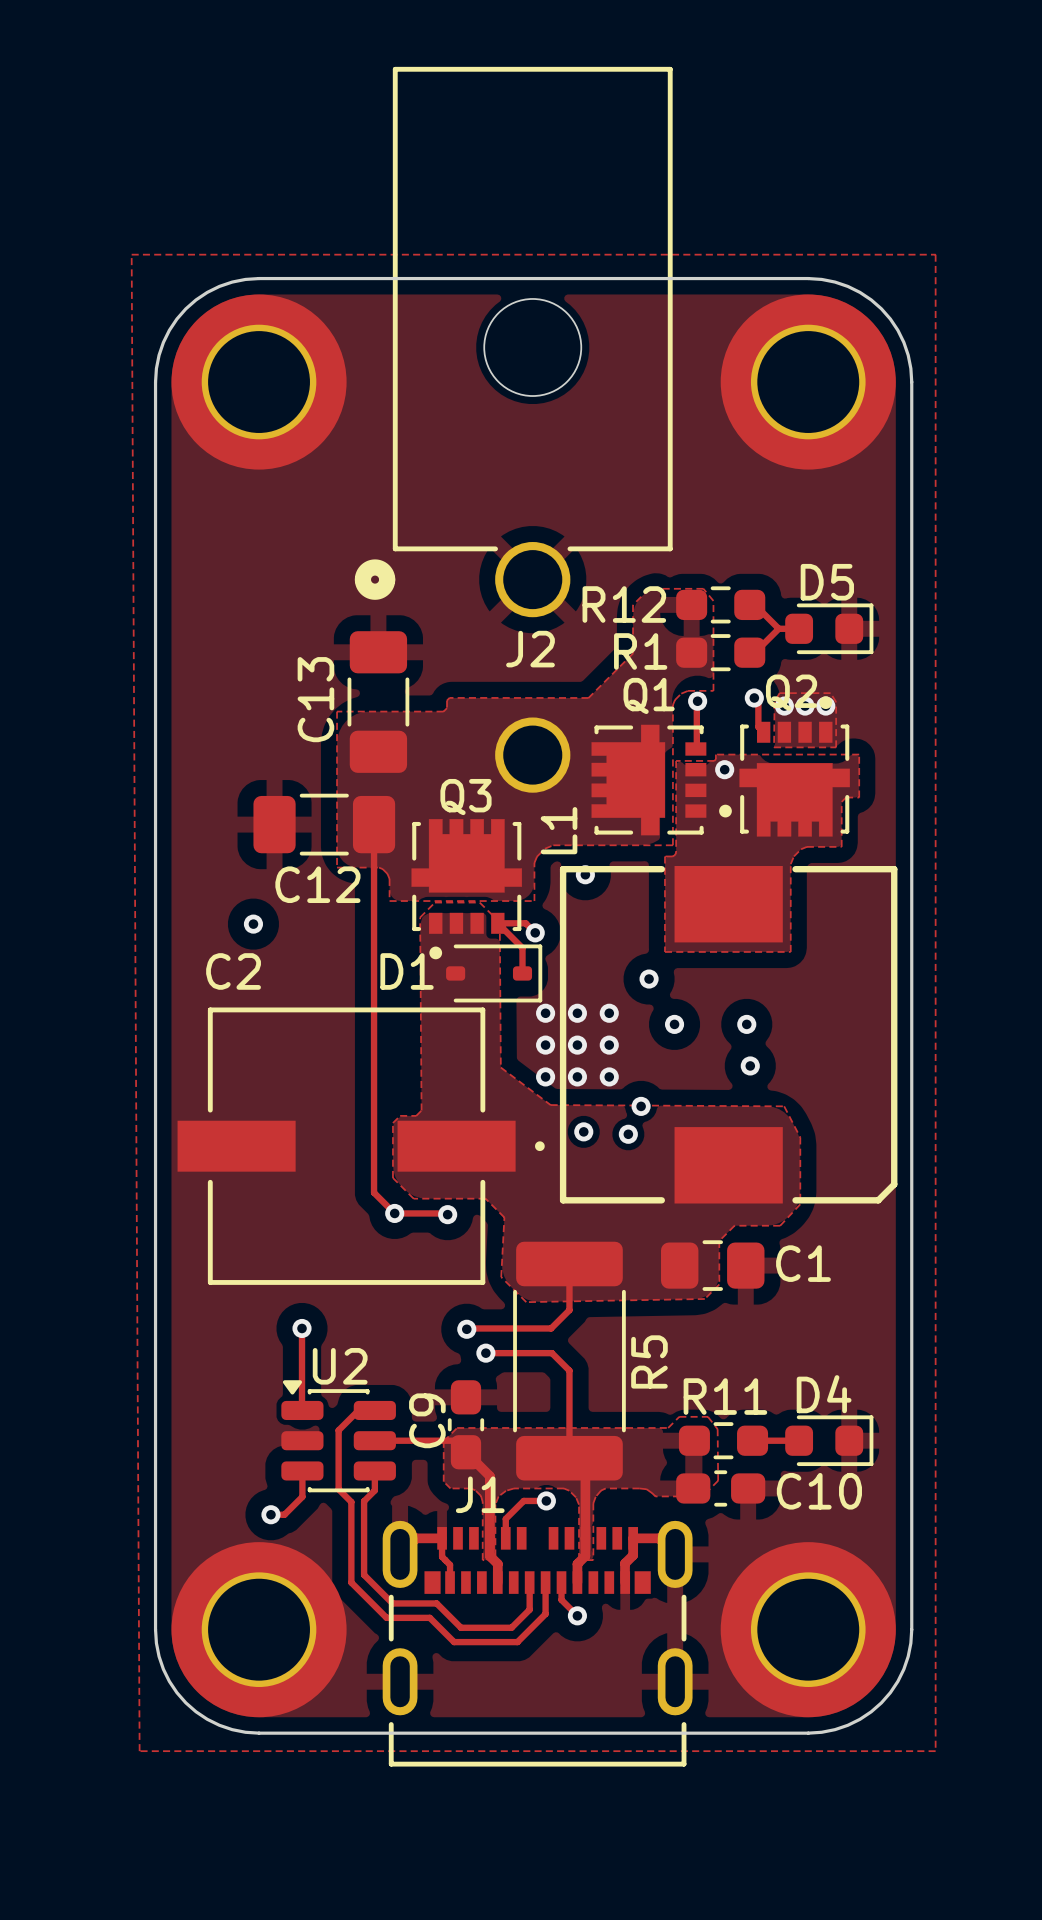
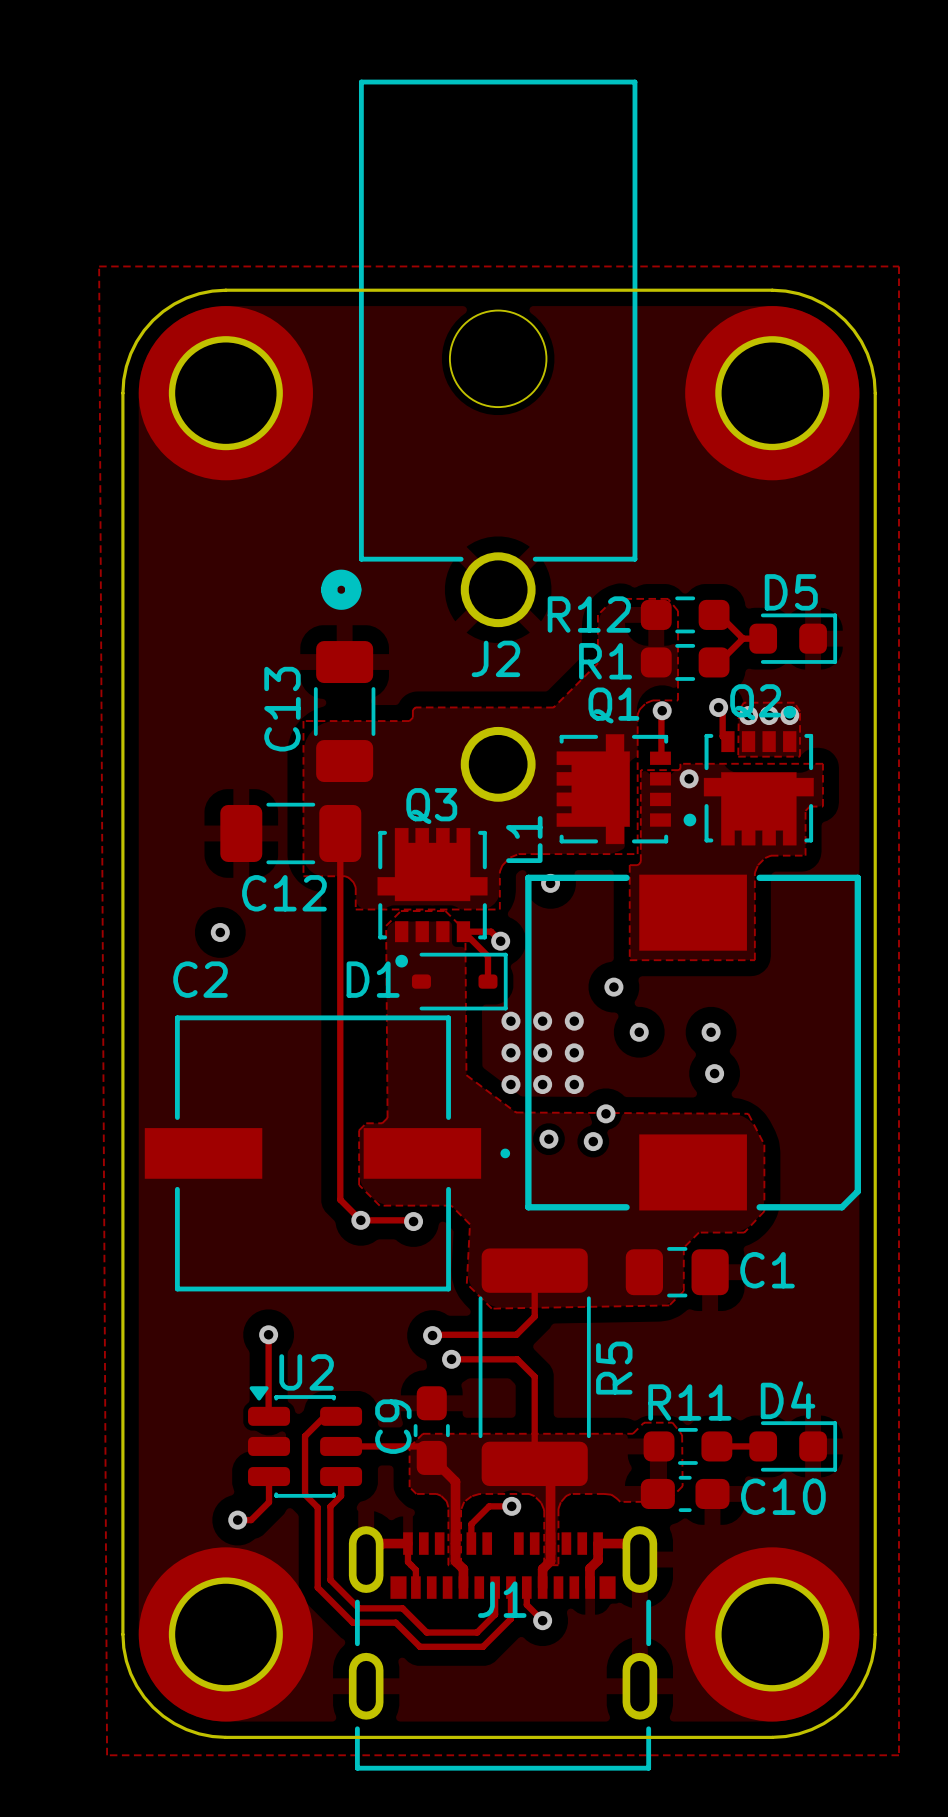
J1 name position: J1 (480, 1494) -> J1 (502, 1599)

